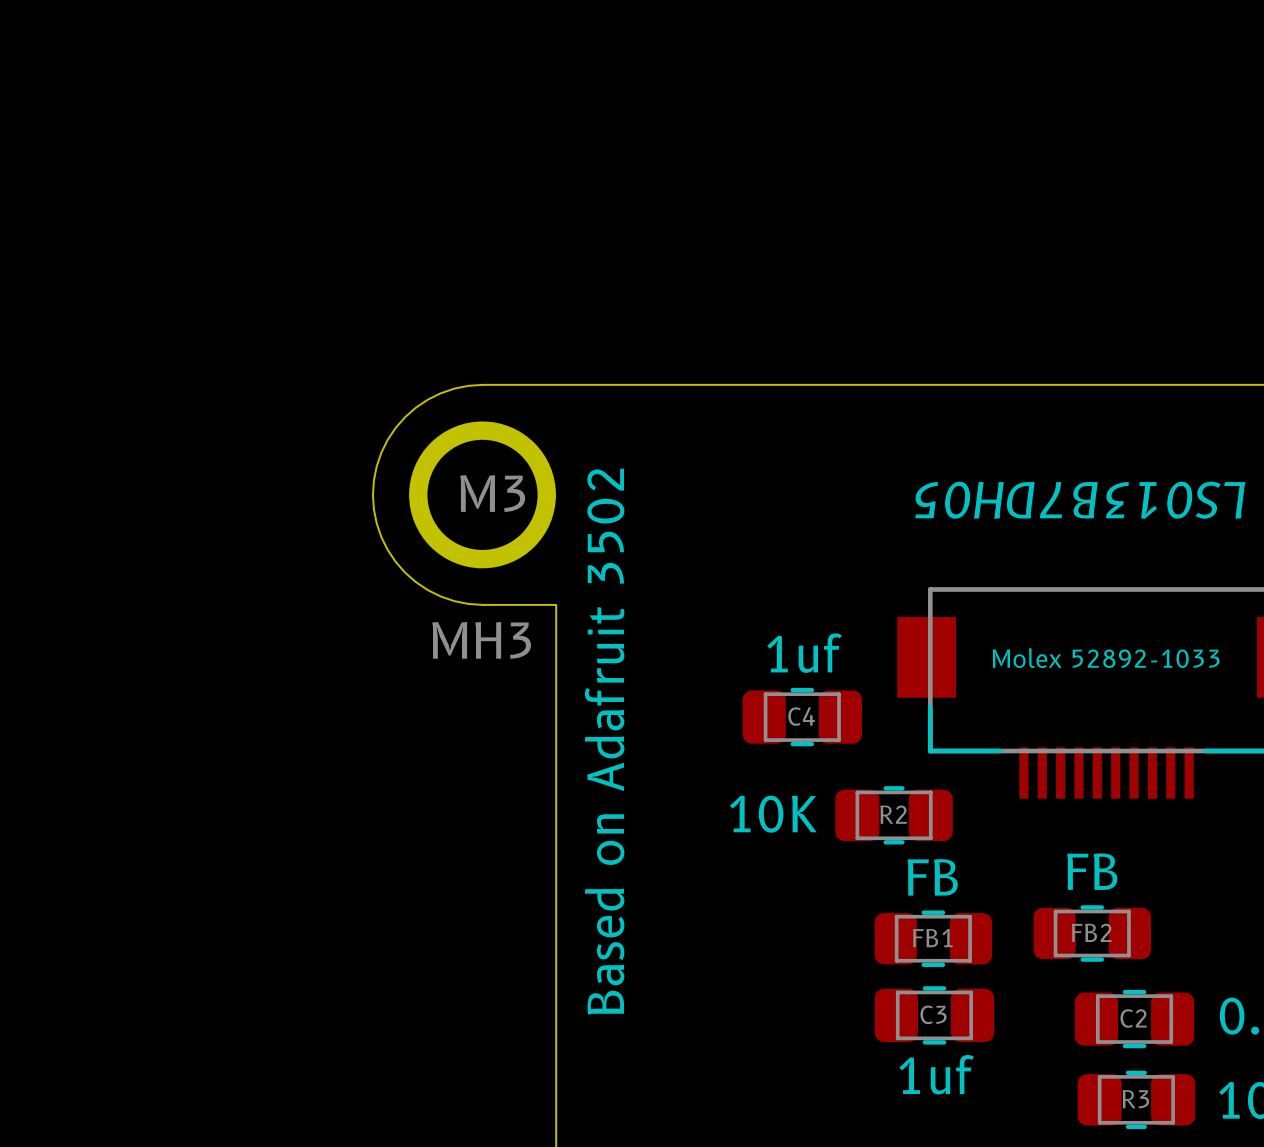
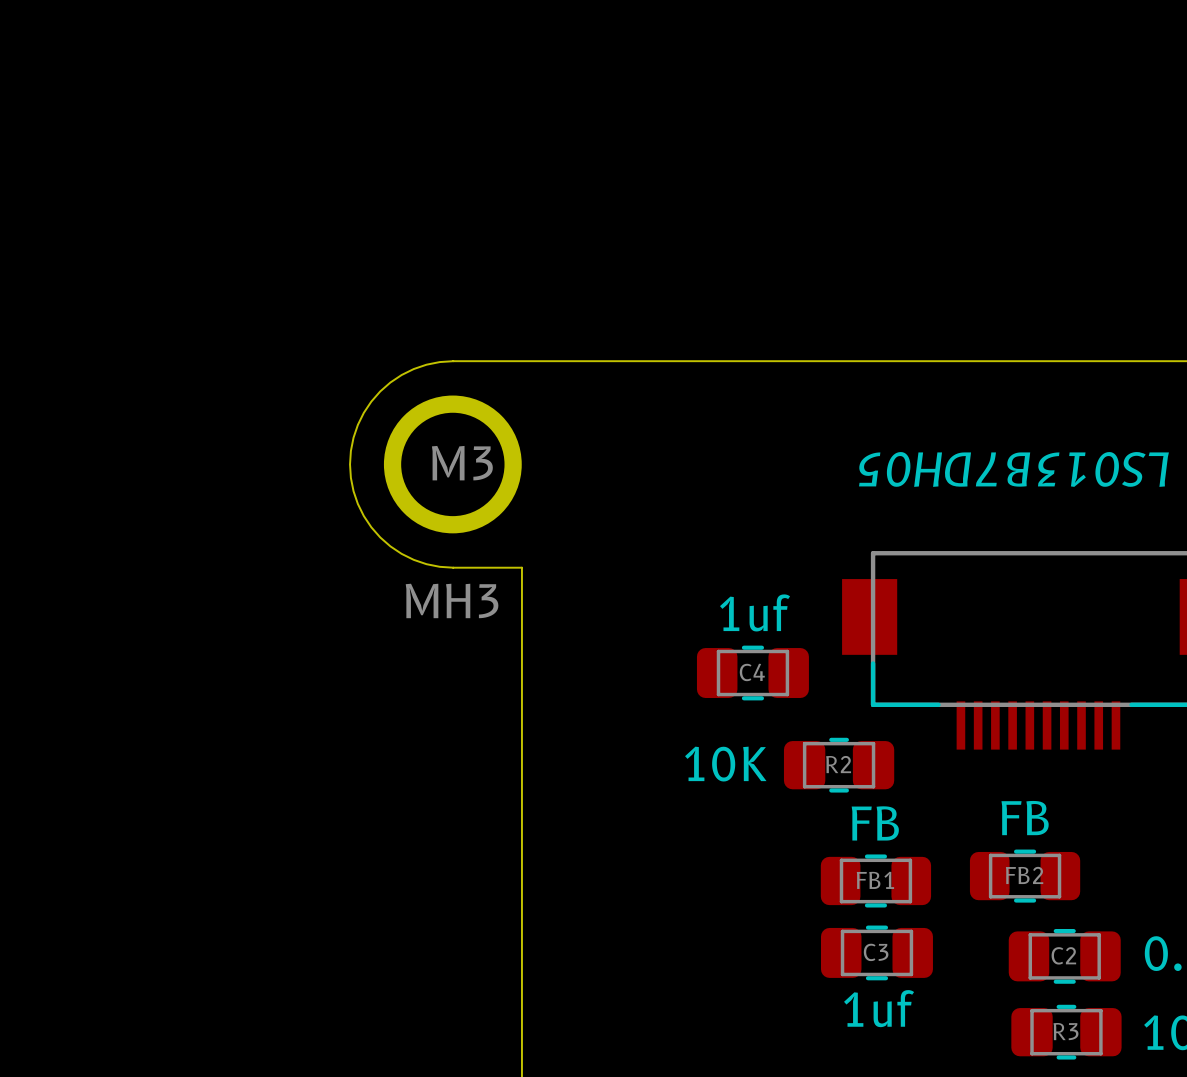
part text: Molex 52892-1033 (1106, 658) -> none
text: Based on Adafruit 3502 (604, 741) -> none

